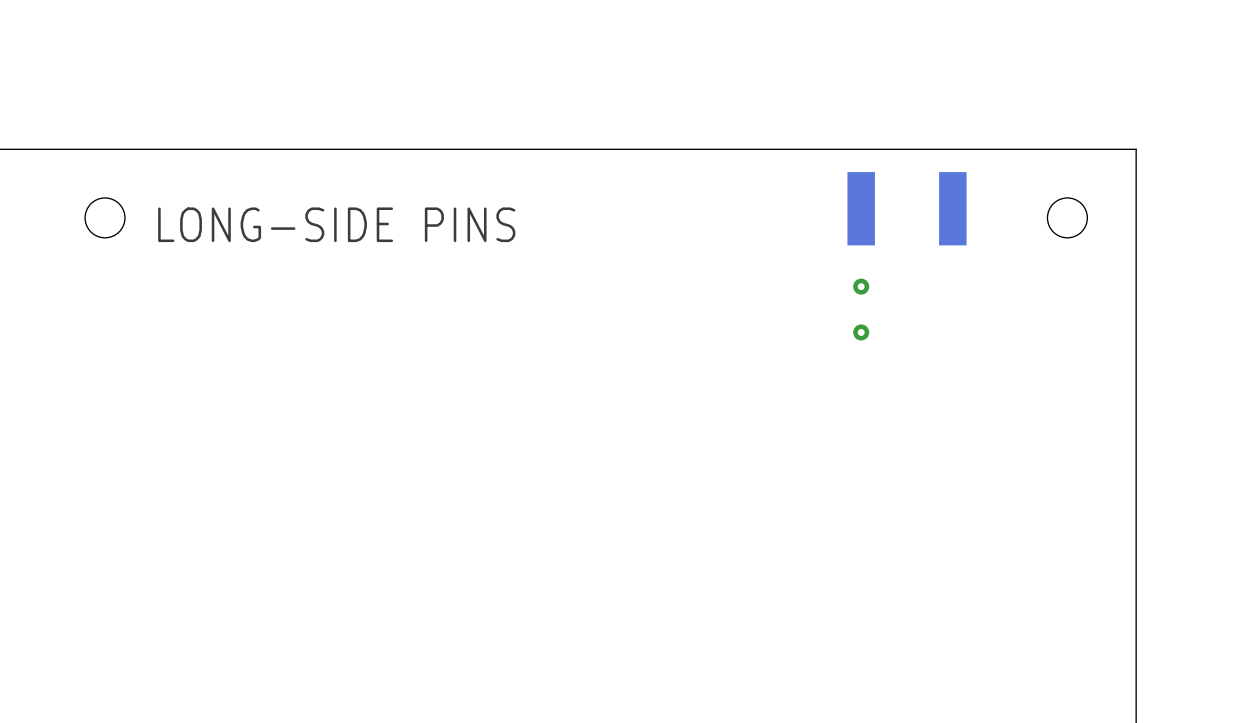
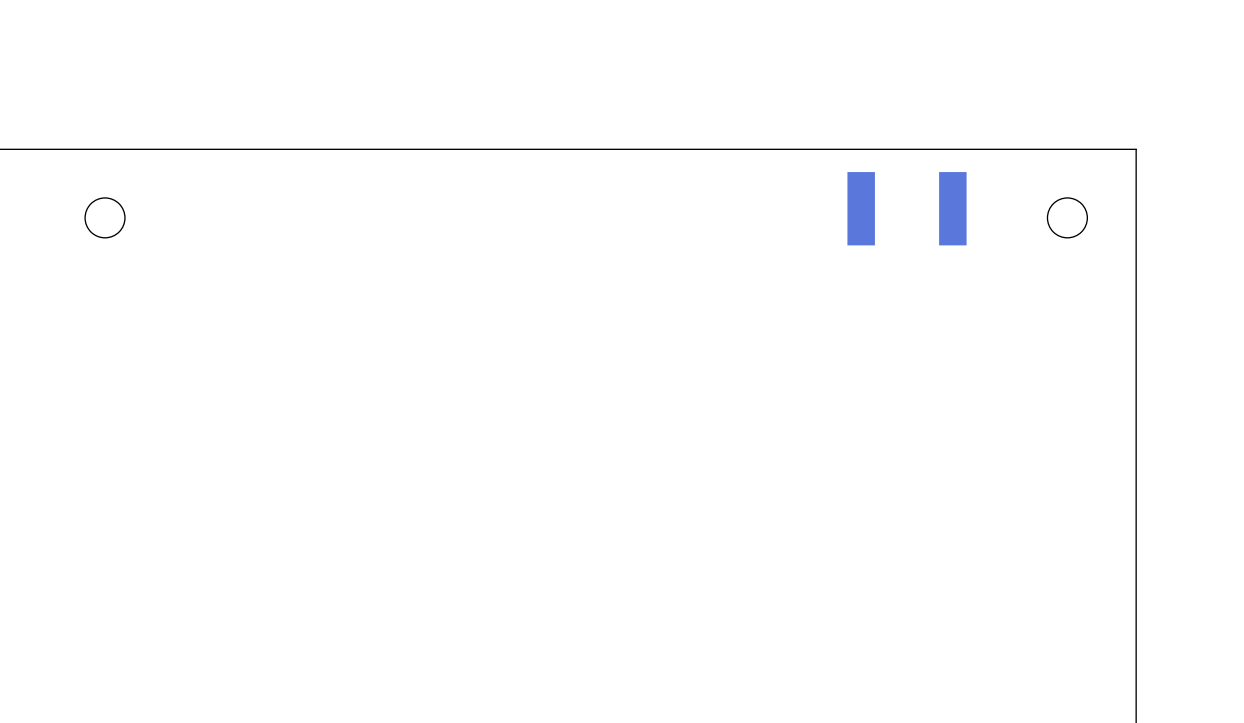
text: LONG-SIDE PINS (336, 224) -> none
part: (861, 309) -> none

